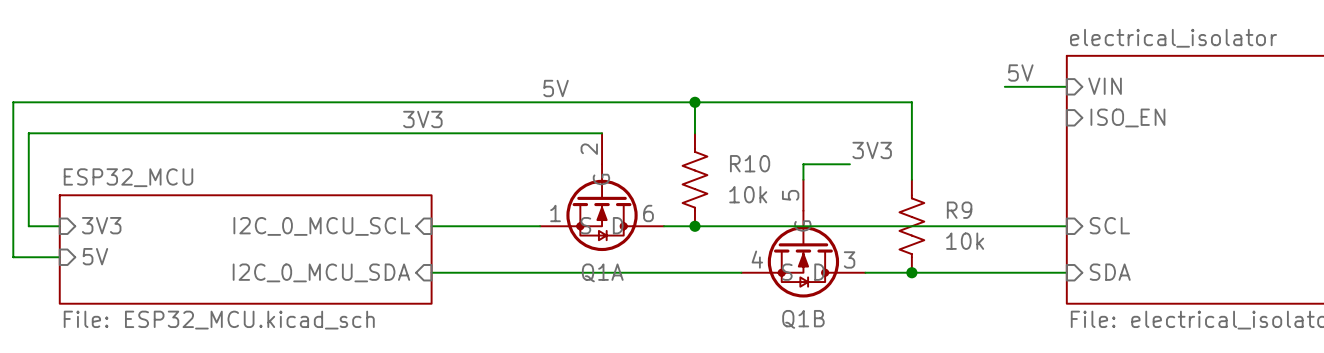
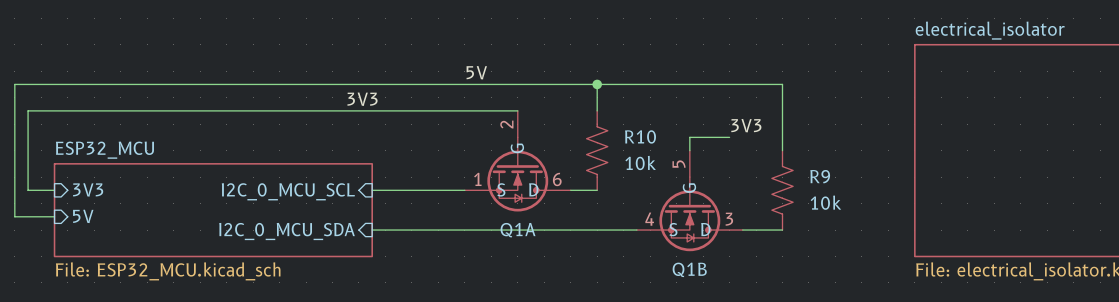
label: 5V (1020, 73) -> none
wire: (1004, 86) (1066, 86) -> none
sheet pin: VIN (1105, 86) -> none
sheet pin: ISO_EN (1127, 117) -> none
sheet pin: SCL (1109, 225) -> none
wire: (694, 226) (1066, 226) -> none
junction: (694, 226) -> none
wire: (911, 272) (1066, 272) -> none
junction: (911, 272) -> none
sheet pin: SDA (1110, 272) -> none

